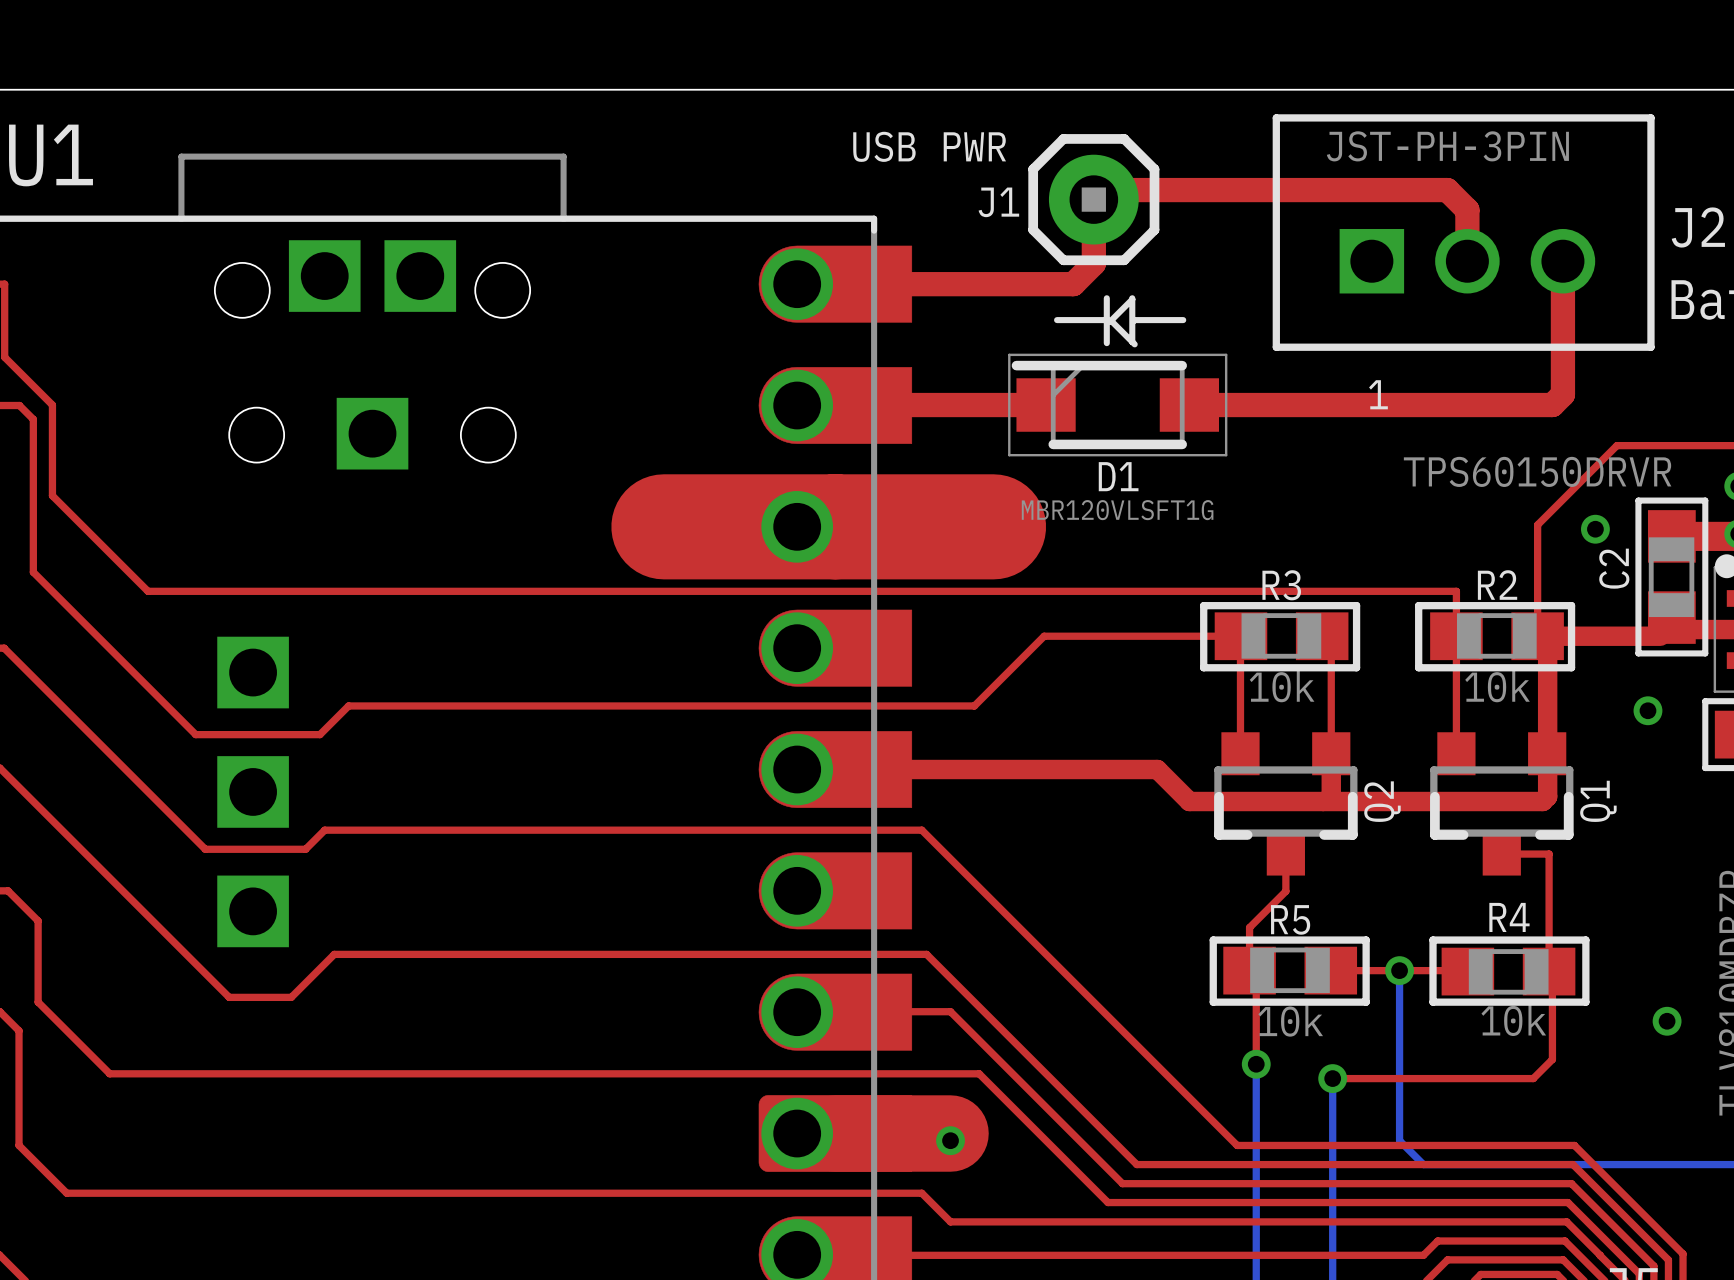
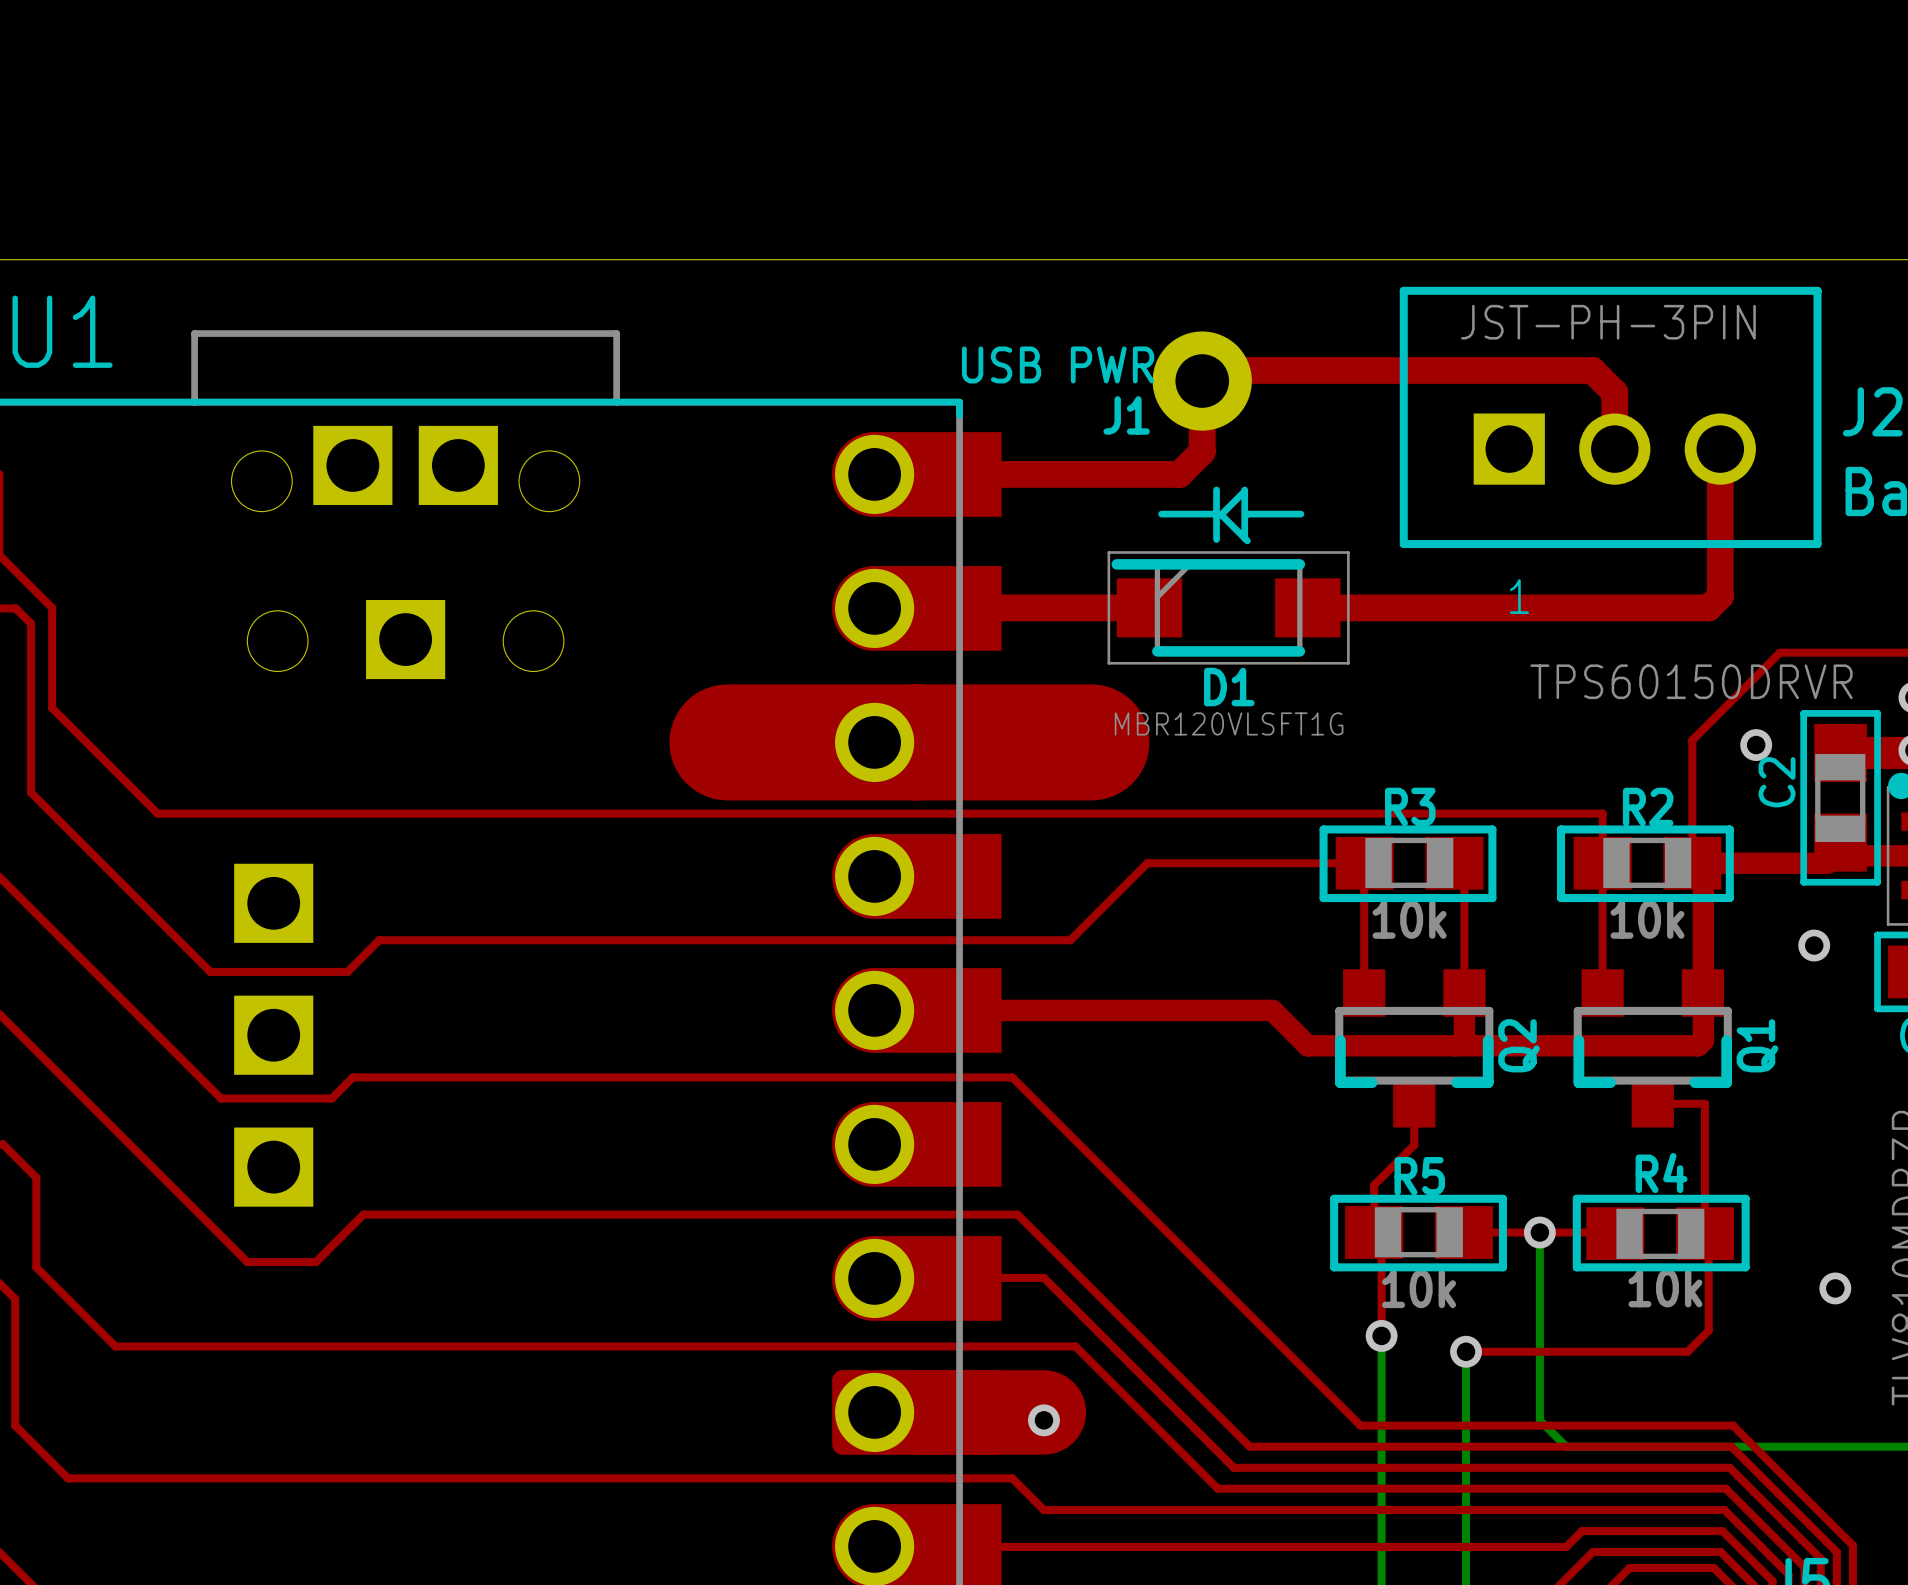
J1 footprint: [1028, 134, 1160, 266] -> [1152, 331, 1252, 431]
text position: USB PWR (929, 146) -> USB PWR (1058, 364)

